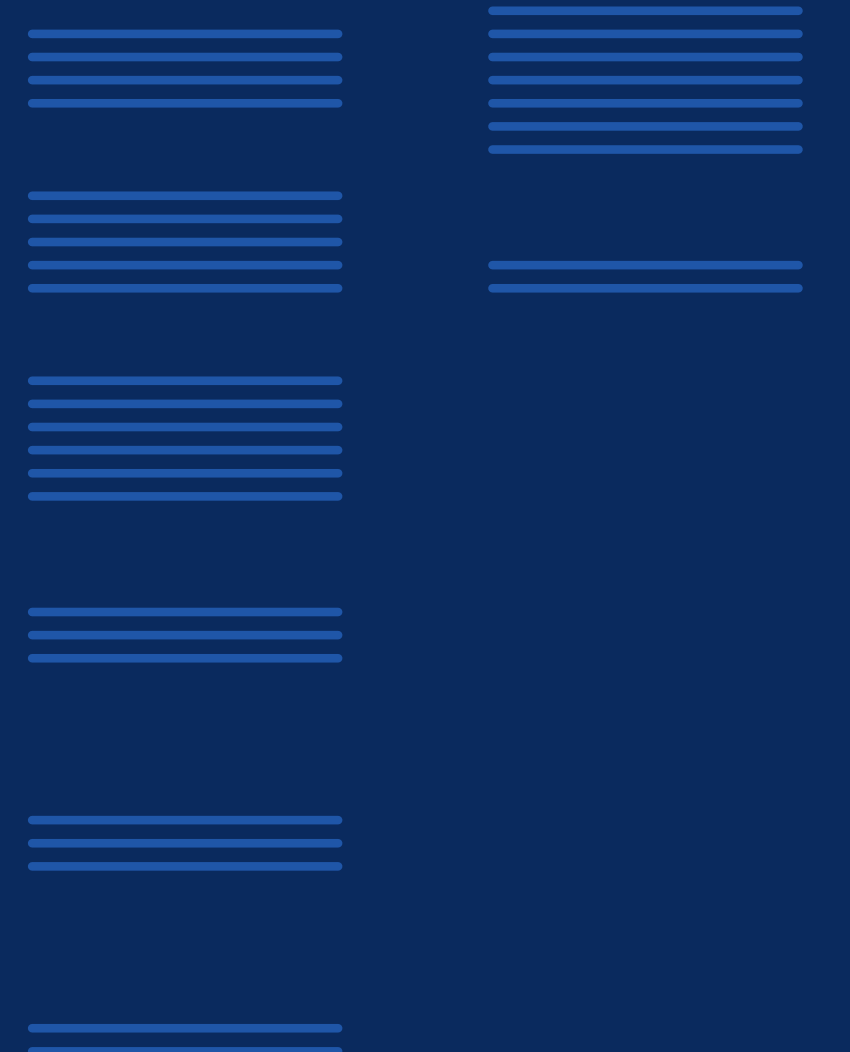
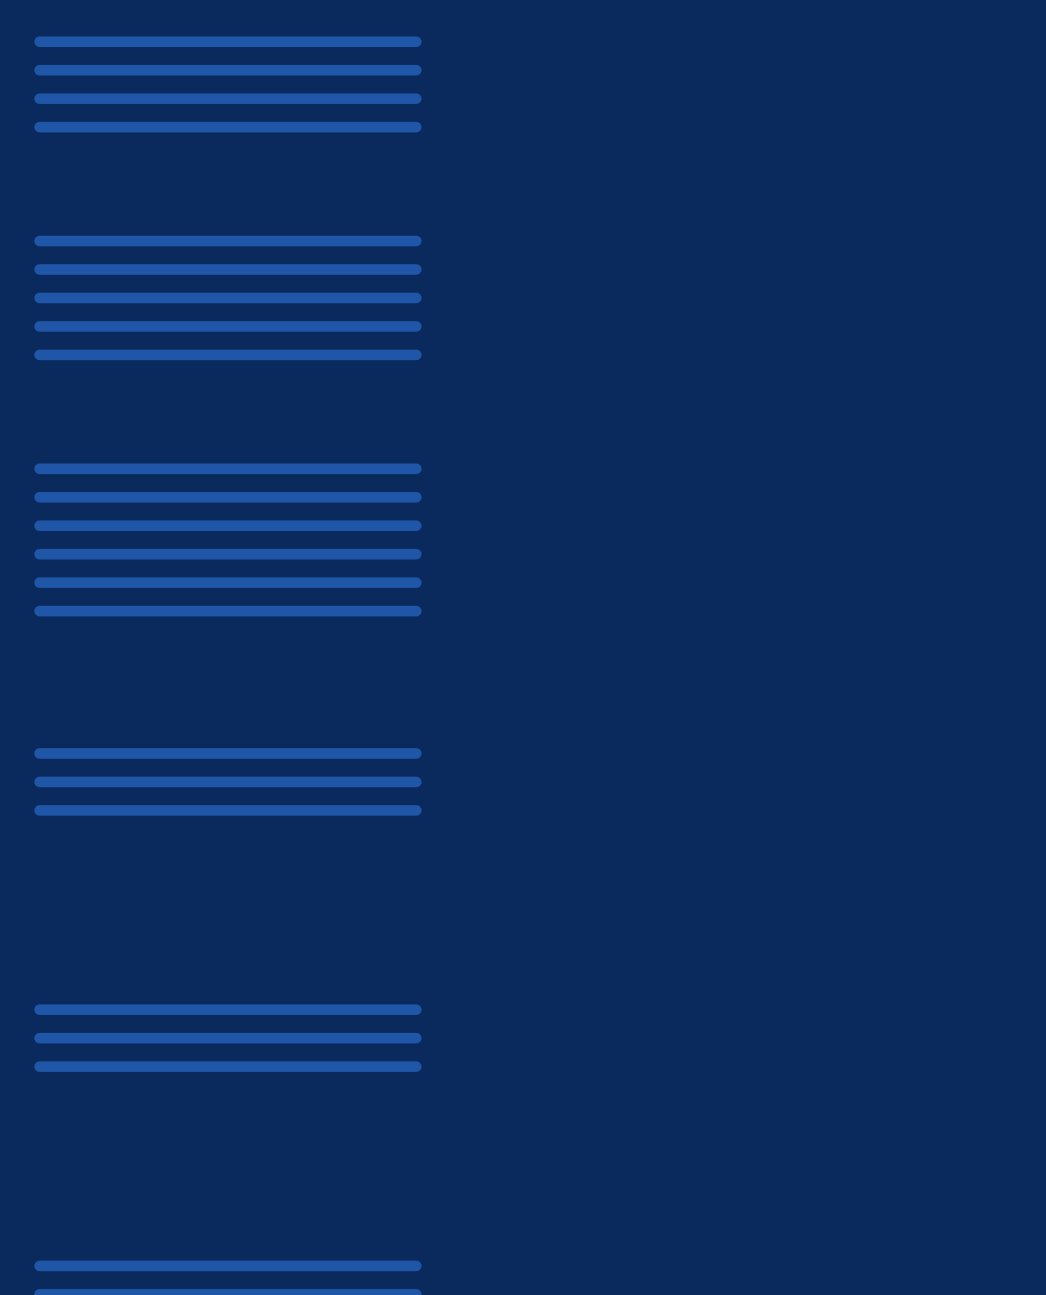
track: (492, 10) (798, 10) -> none
track: (492, 33) (798, 33) -> none
track: (492, 57) (798, 57) -> none
track: (492, 80) (798, 80) -> none
track: (492, 103) (798, 103) -> none
track: (492, 126) (798, 126) -> none
track: (492, 149) (798, 149) -> none
track: (492, 265) (798, 265) -> none
track: (492, 288) (798, 288) -> none

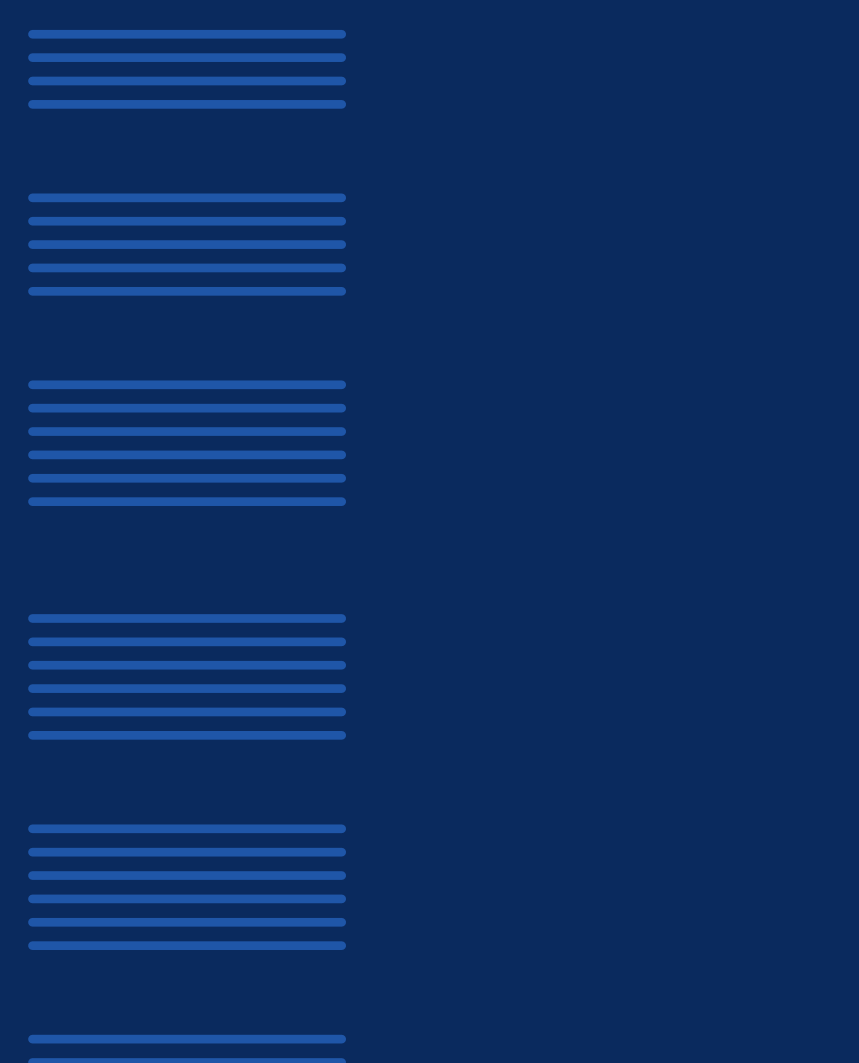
track: none -> (32, 688) (341, 688)
track: none -> (32, 711) (341, 711)
track: none -> (32, 735) (341, 735)
track: none -> (32, 898) (341, 898)
track: none -> (32, 922) (341, 922)
track: none -> (32, 945) (341, 945)

